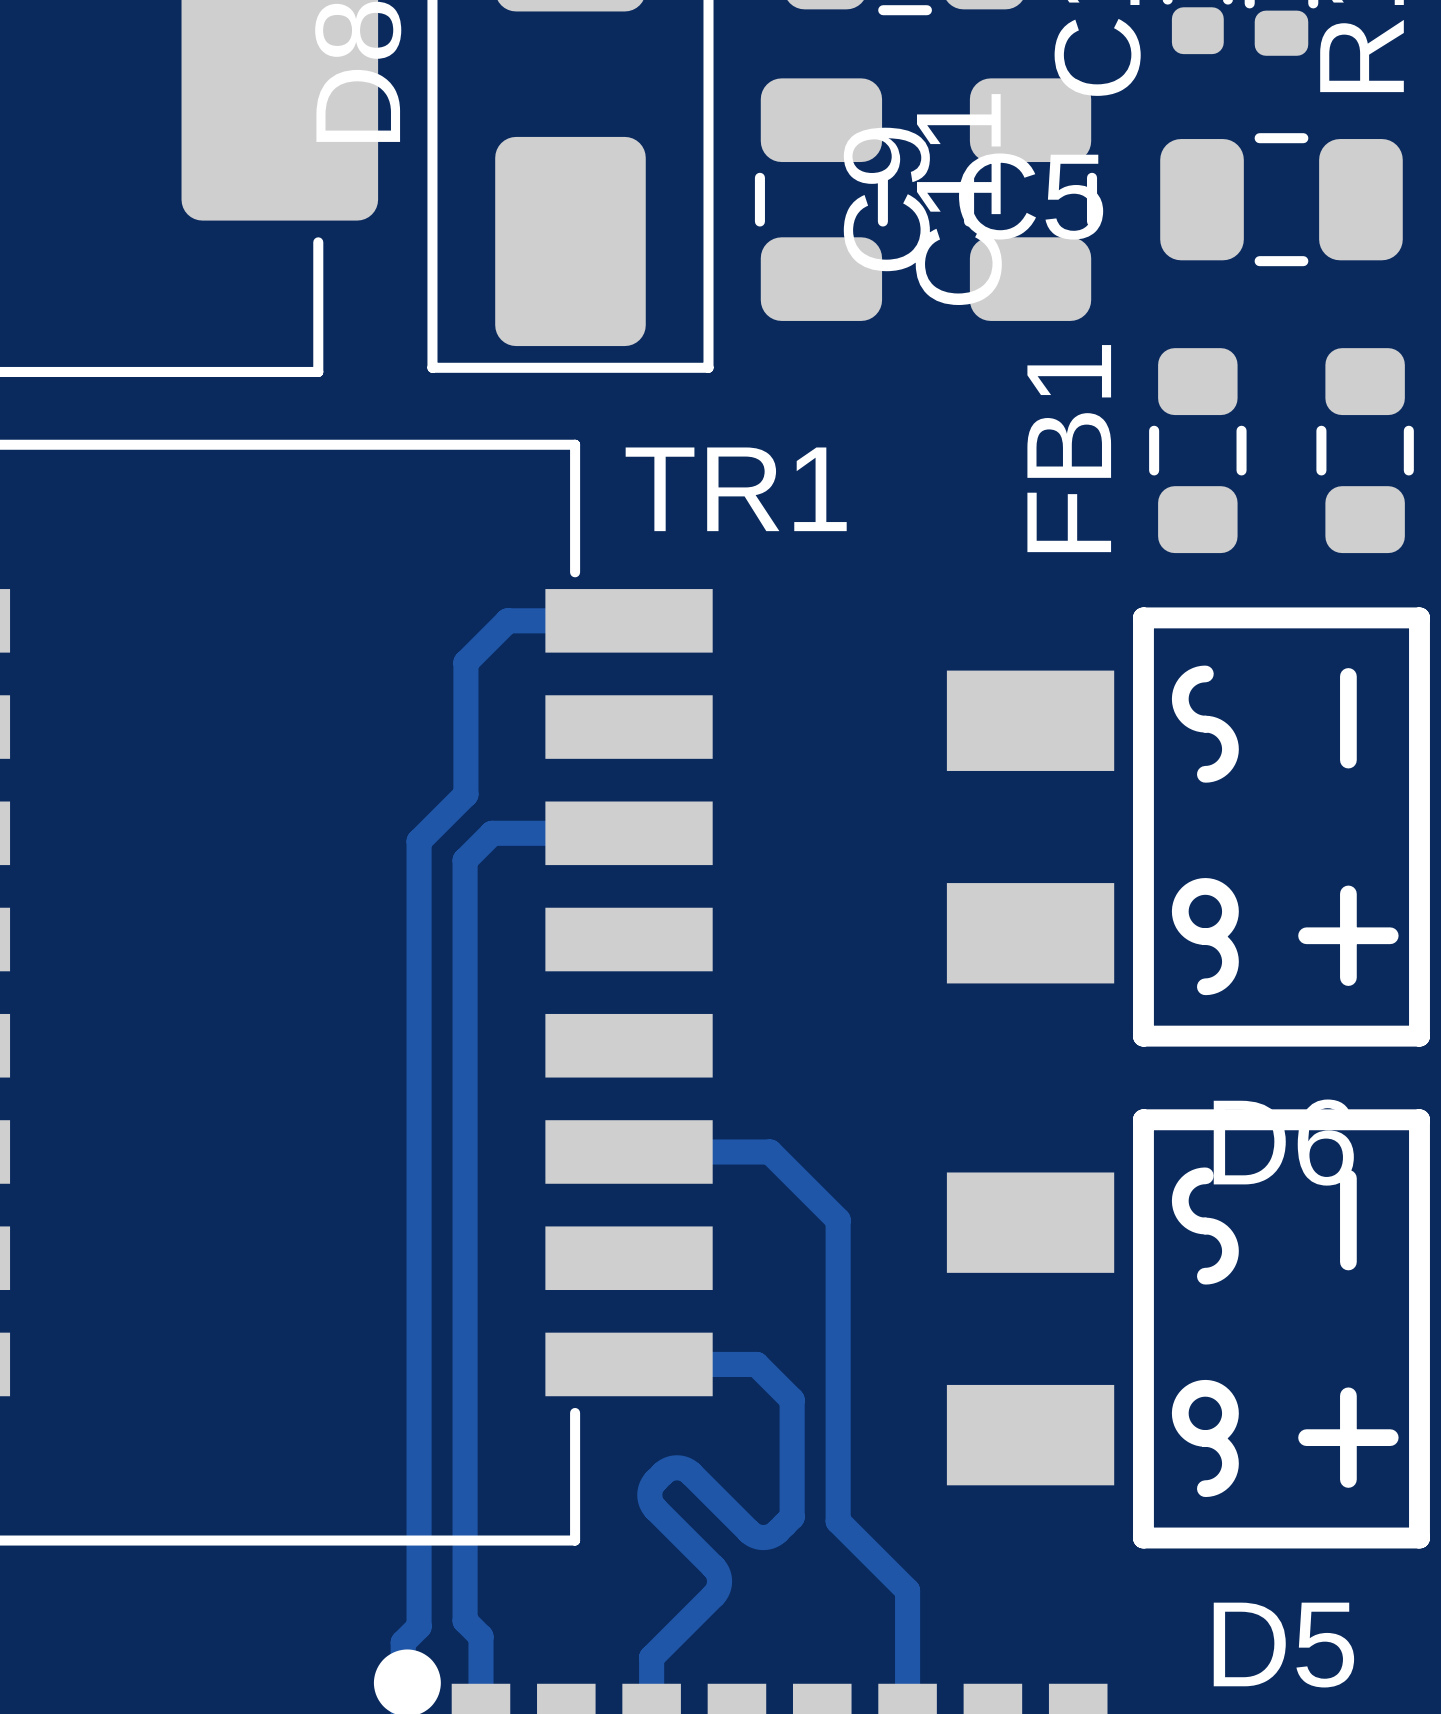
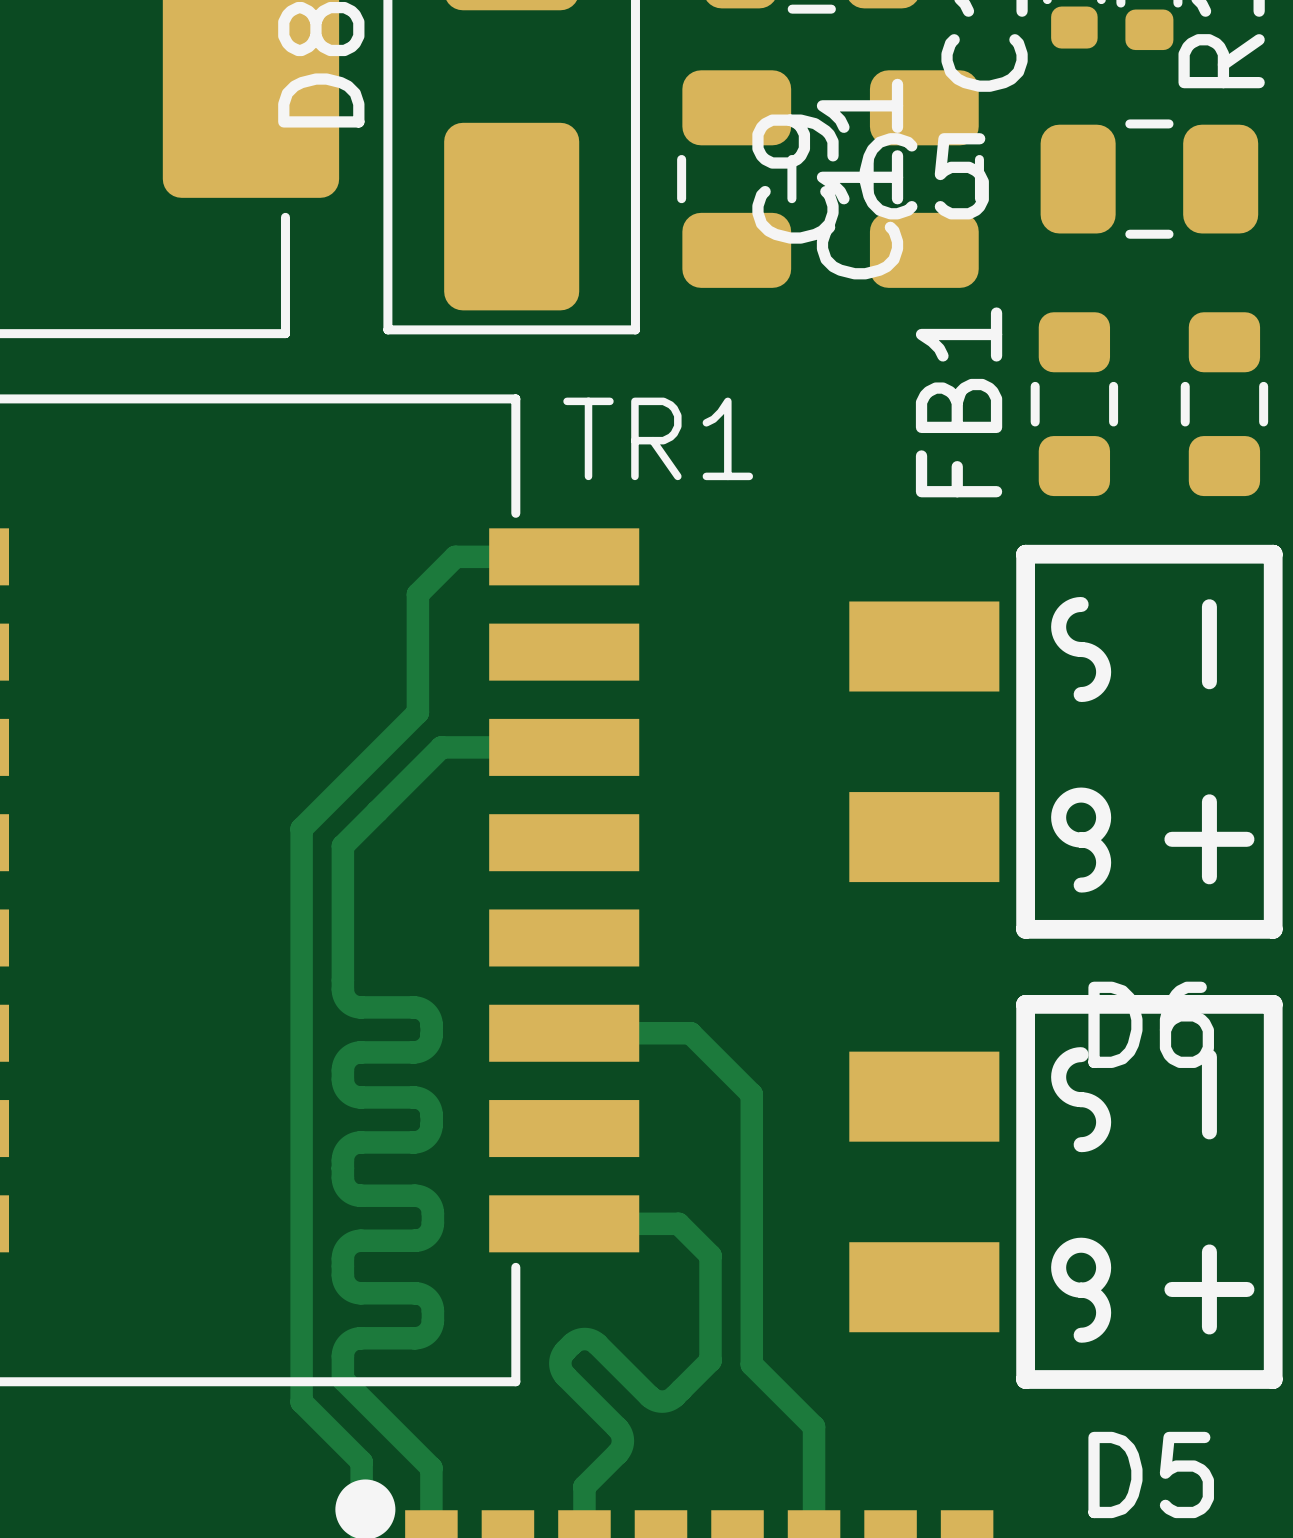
track: (419, 841) (419, 1626) (403, 1642) -> (375, 754) (301, 828) (301, 1402) (361, 1462) (361, 1473)
track: (465, 860) (465, 1620) -> (417, 771) (342, 845) (342, 989) (344, 997) (351, 1004) (358, 1007) (419, 1008) (427, 1014) (431, 1023) (430, 1040) (421, 1050) (413, 1052) (356, 1052) (346, 1059) (342, 1070) (343, 1085) (353, 1095) (360, 1097) (417, 1097) (426, 1102) (431, 1111) (431, 1128) (423, 1139) (413, 1142) (356, 1142) (346, 1149) (342, 1160) (343, 1183) (353, 1193) (360, 1195) (418, 1196) (427, 1201) (432, 1209) (431, 1228) (422, 1238) (414, 1240) (356, 1241) (346, 1247) (342, 1256) (343, 1281) (353, 1291) (360, 1293) (418, 1293) (427, 1298) (431, 1305) (431, 1326) (422, 1336) (414, 1338) (356, 1338) (348, 1343) (342, 1354) (342, 1379) (417, 1453)
track: (777, 1531) (765, 1537) (752, 1534) (685, 1469) (670, 1468) (655, 1480) (649, 1492) (652, 1505) (713, 1567) (718, 1576) (719, 1583) (715, 1593) (688, 1620) -> (697, 1373) (671, 1398) (658, 1401) (649, 1396) (592, 1340) (578, 1340) (565, 1350) (560, 1363) (564, 1374) (620, 1431) (622, 1443) (617, 1453)

